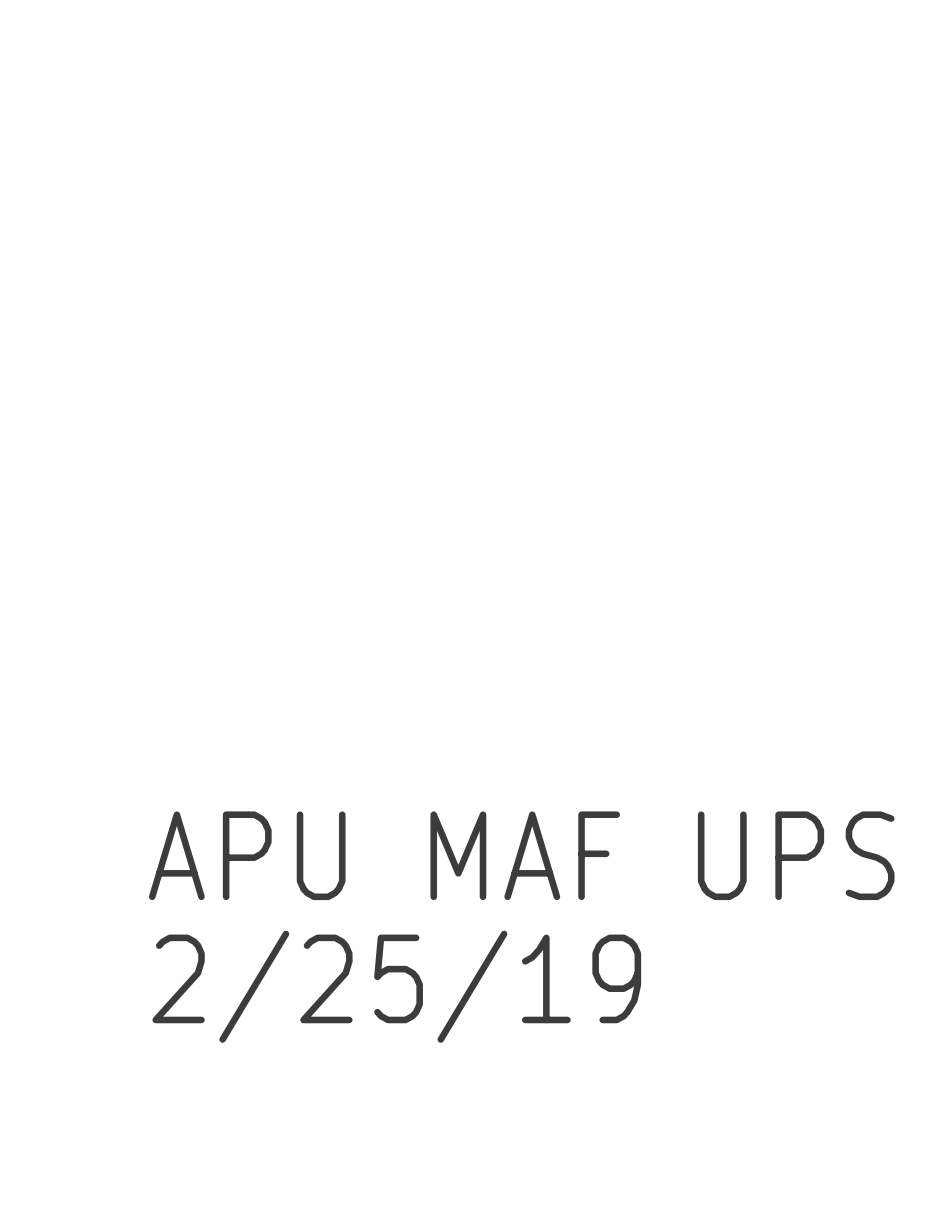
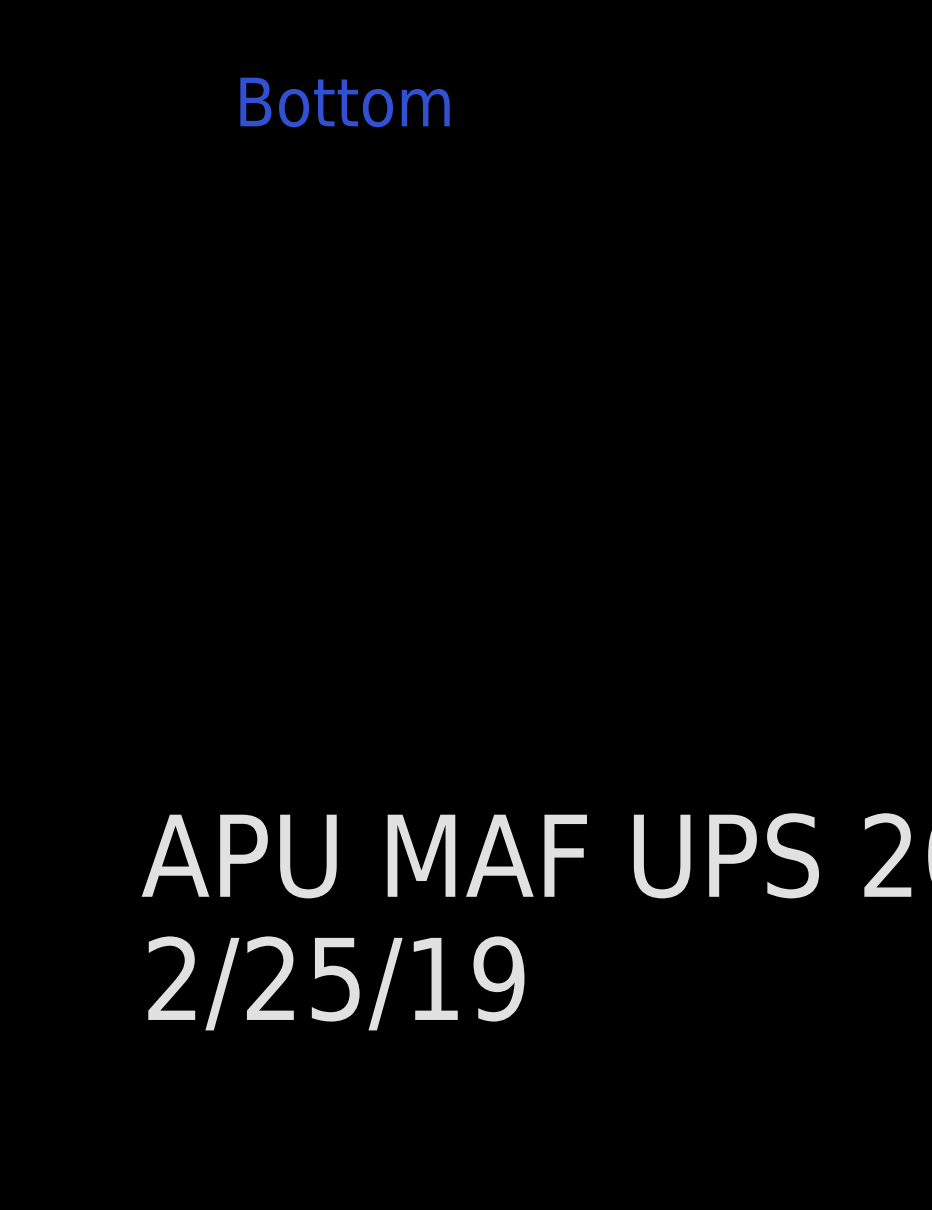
text: none -> Bottom (345, 102)

